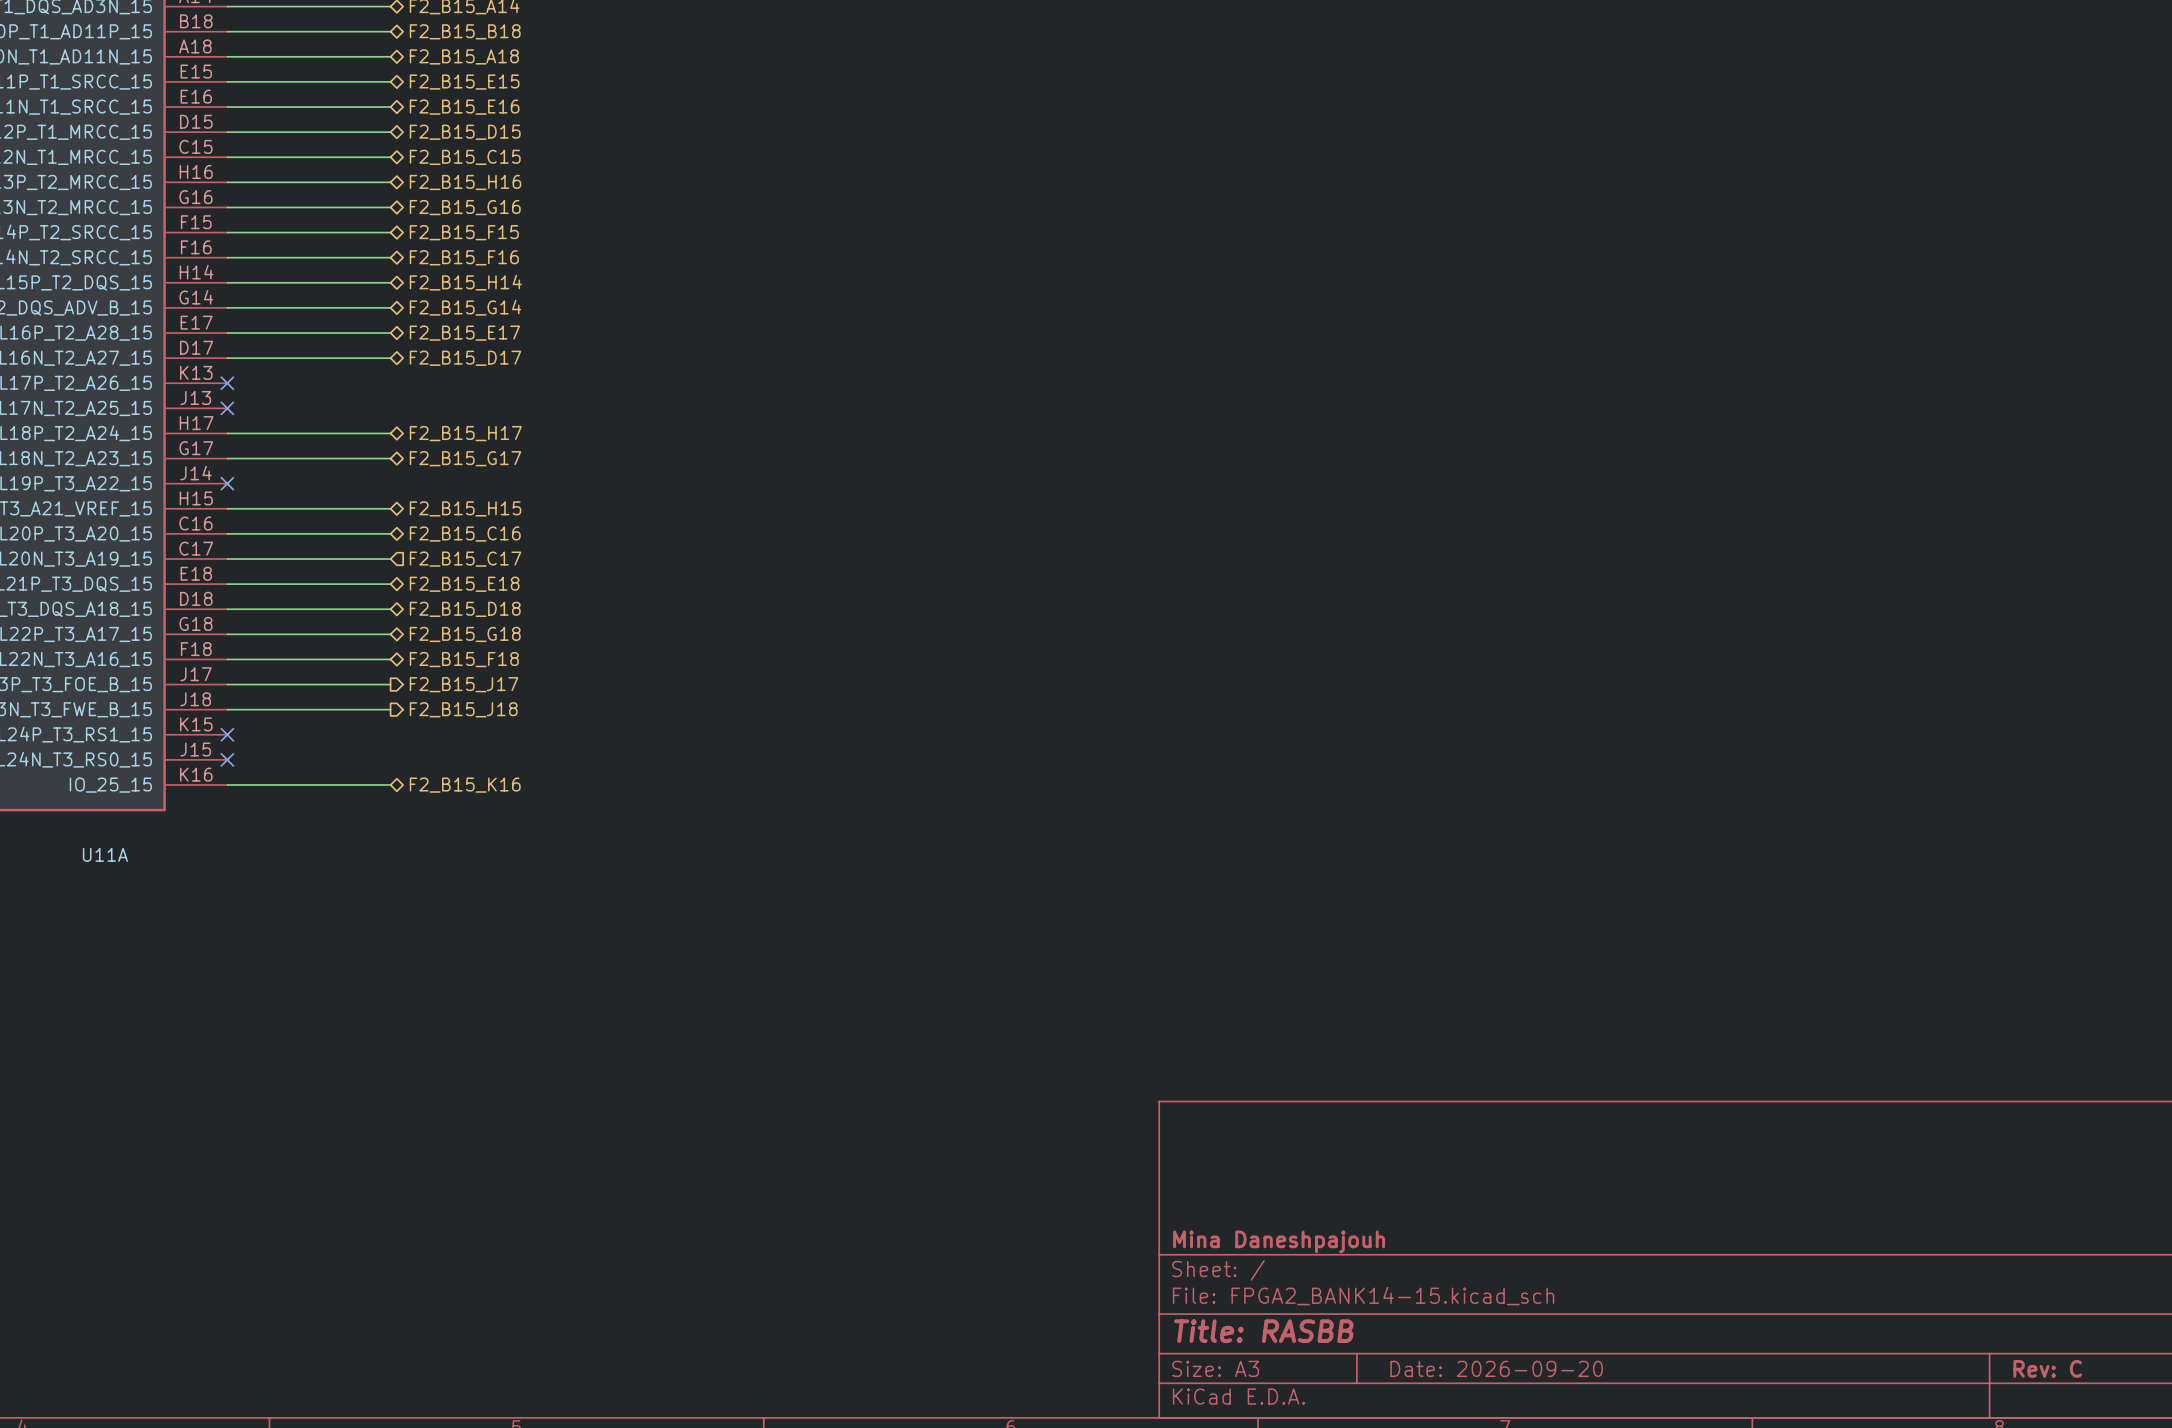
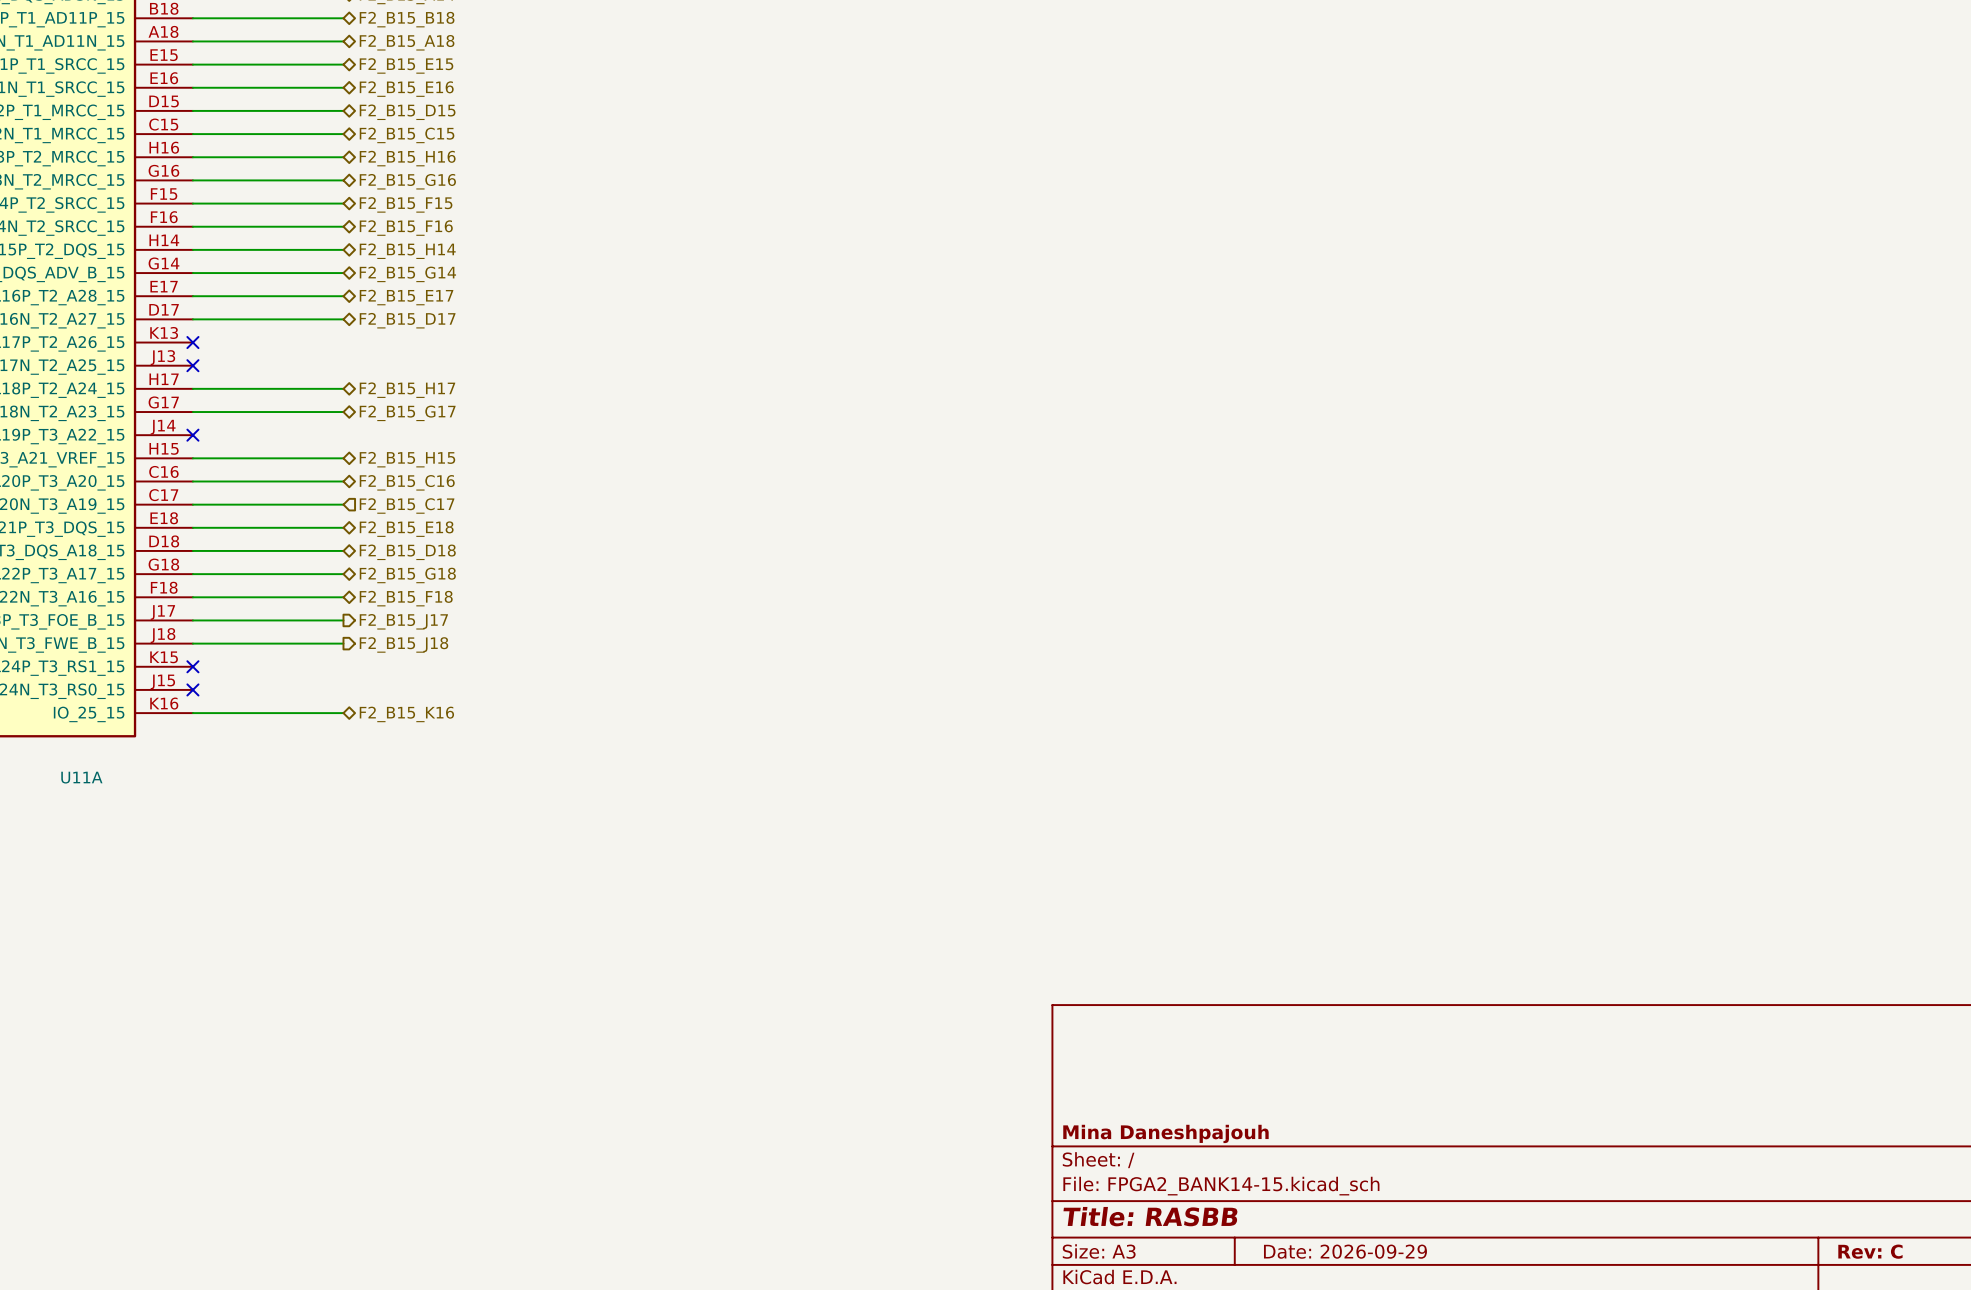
title block: Date: 2026-09-20 (1496, 1368) -> Date: 2026-09-29 (1345, 1251)

